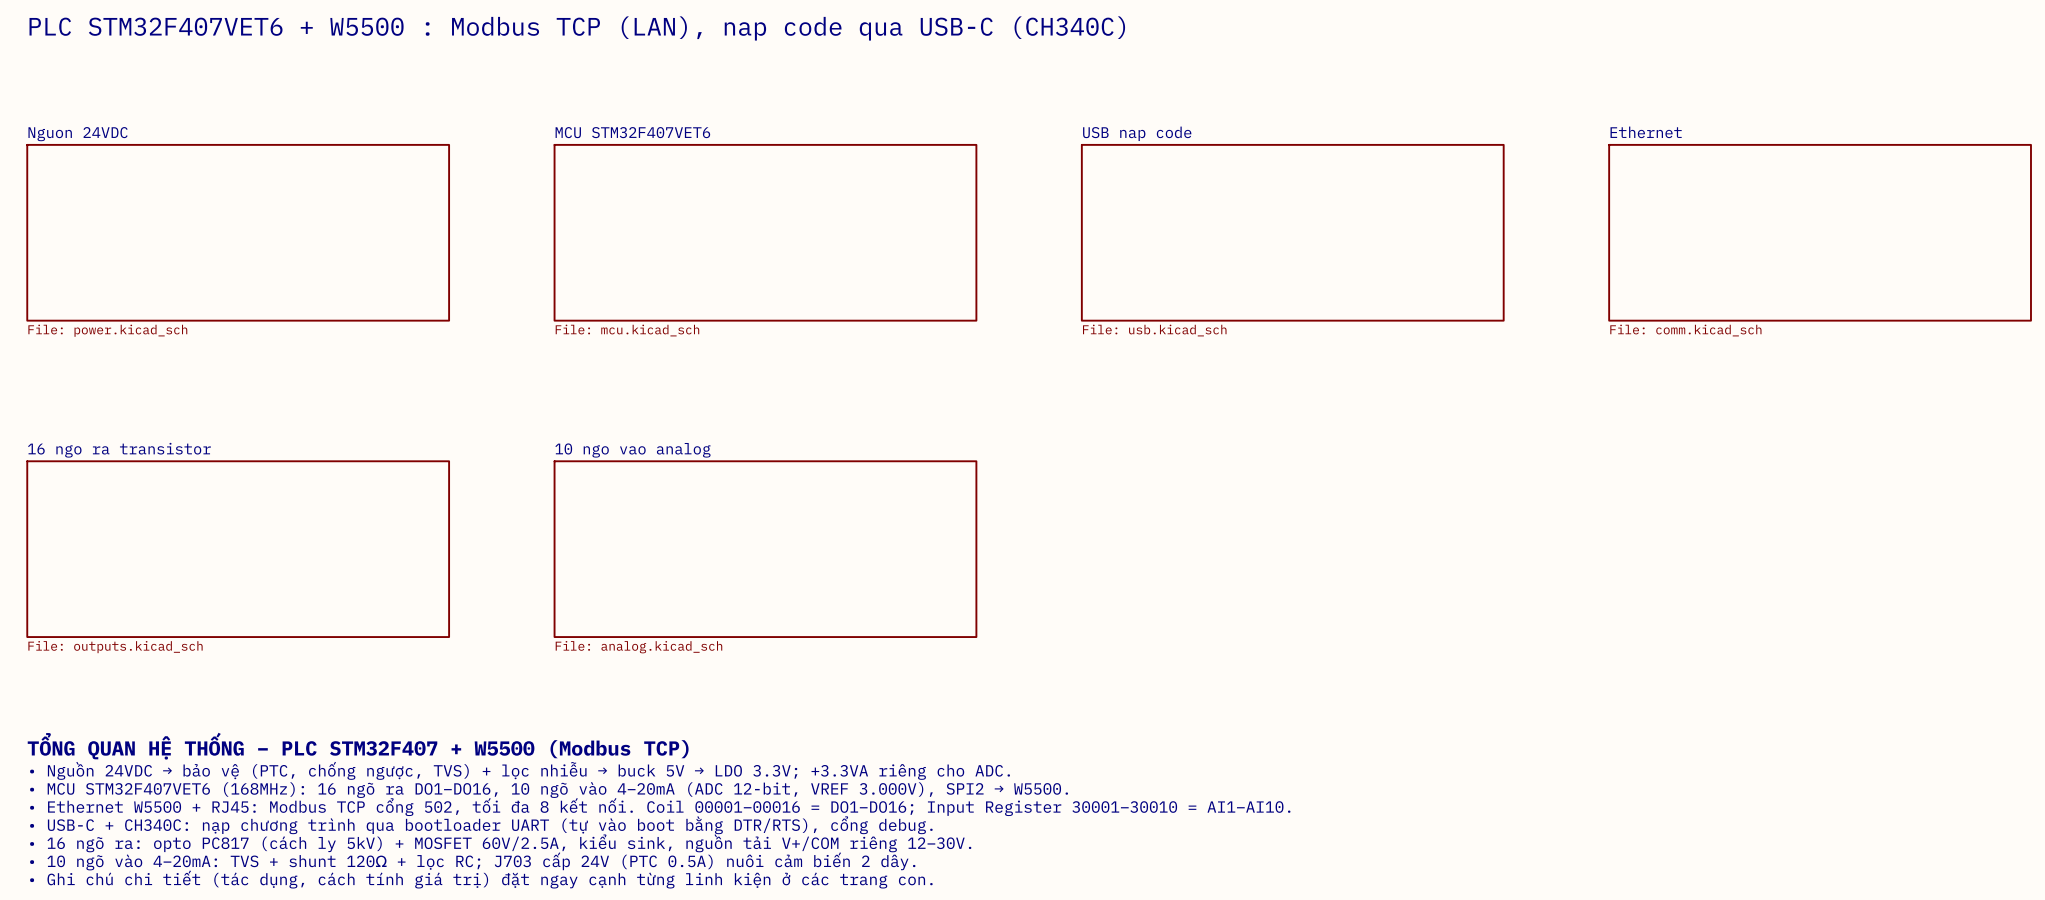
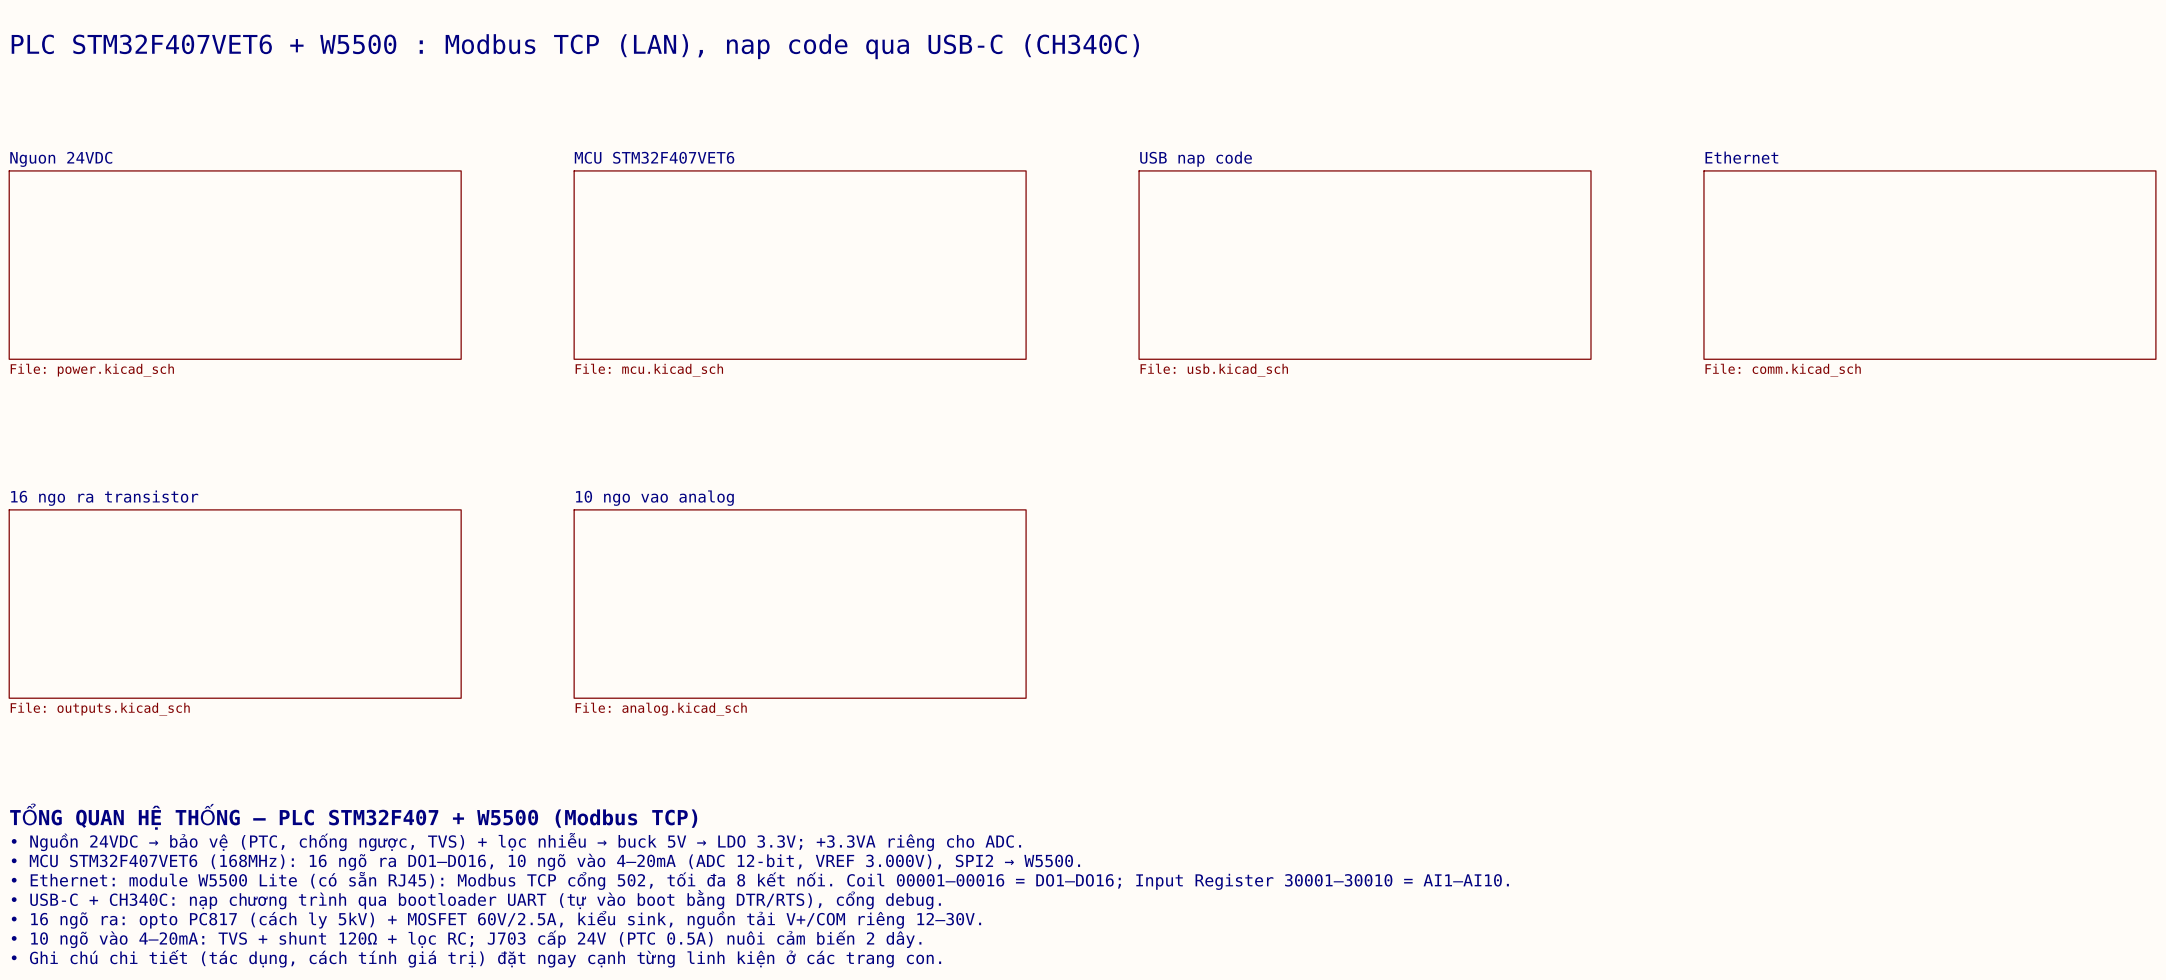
text: • Ethernet W5500 + RJ45: Modbus TCP cổng 502, tối đa 8 kết nối. Coil 00001–00016 = DO1–DO16; Input Register 30001–30010 = AI1–AI10. (660, 807) -> • Ethernet: module W5500 Lite (có sẵn RJ45): Modbus TCP cổng 502, tối đa 8 kết nối. Coil 00001–00016 = DO1–DO16; Input Register 30001–30010 = AI1–AI10. (760, 880)

